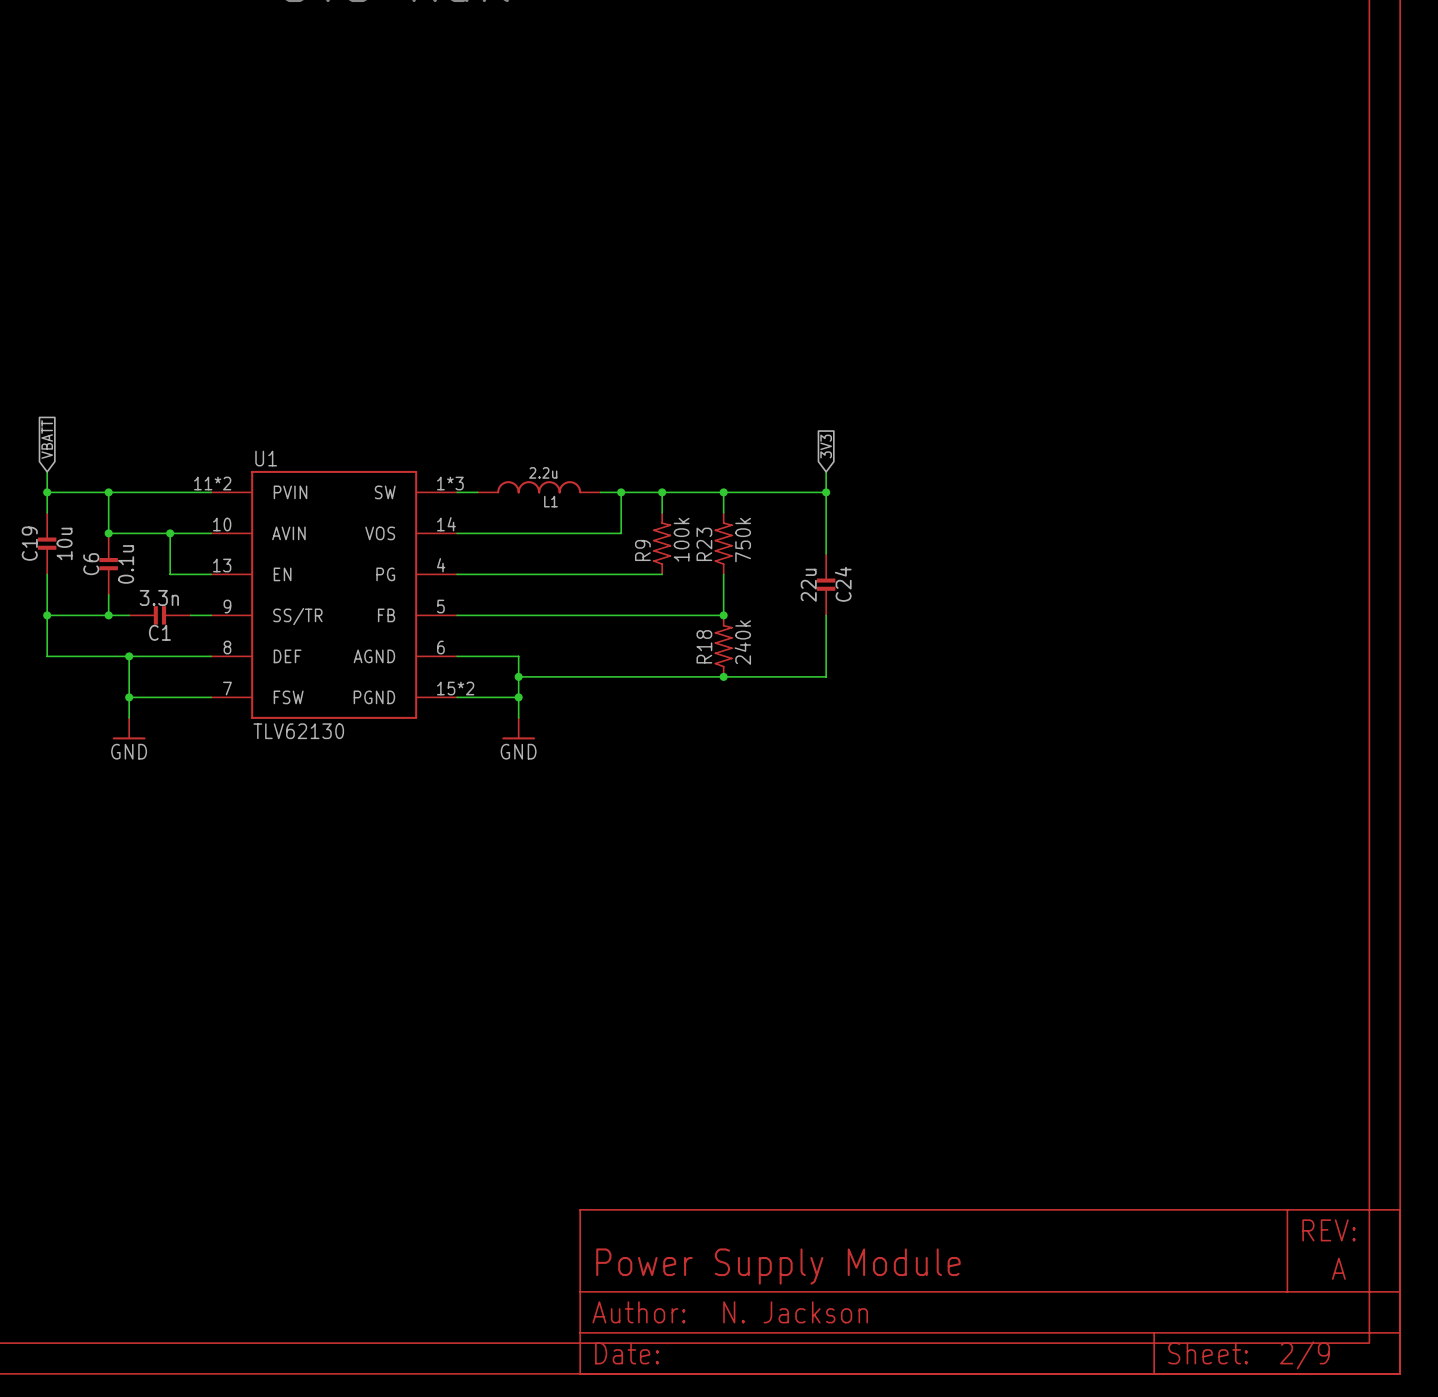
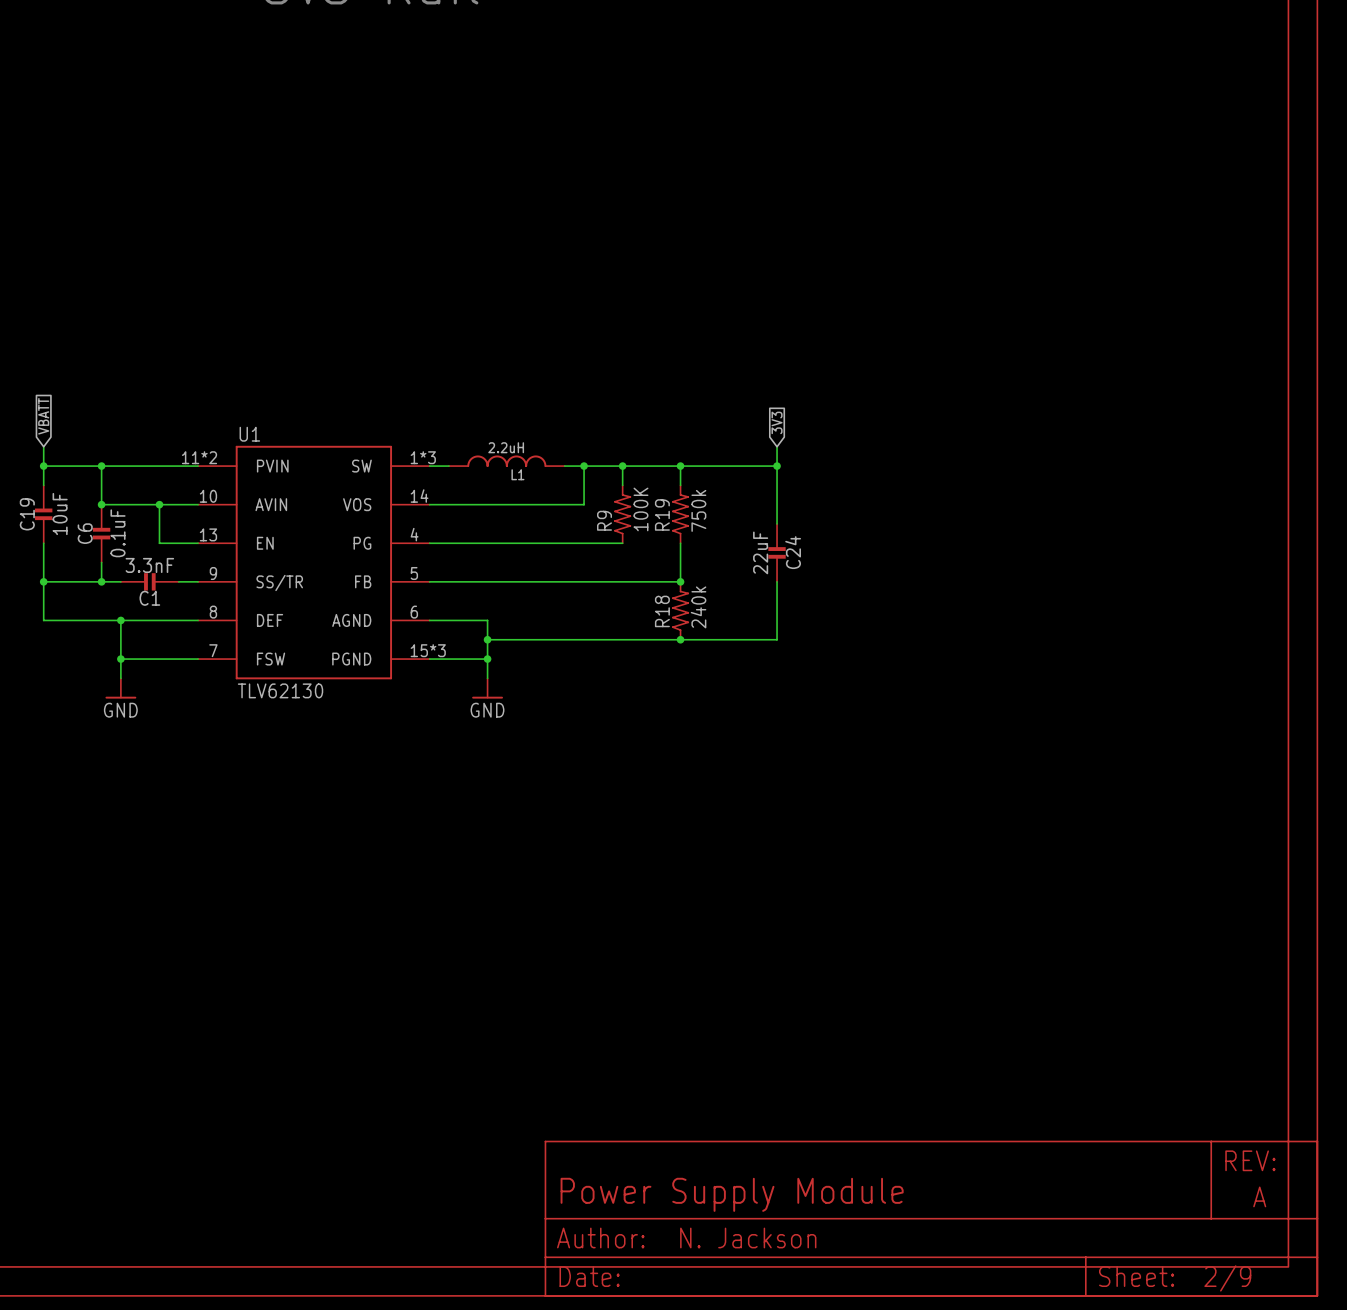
L1 value: 2.2u (543, 472) -> 2.2uH (506, 447)
R9 value: 100k (681, 539) -> 100K (640, 509)
C19 value: 10u (64, 543) -> 10uF (60, 514)
R23 name: R23 (704, 544) -> R19 (662, 514)
C6 value: 0.1u (126, 564) -> 0.1uF (118, 533)
C24 value: 22u (808, 585) -> 22uF (760, 552)
C1 value: 3.3n (159, 597) -> 3.3nF (149, 565)
U1 pin number: 15*2 (455, 688) -> 15*3 (428, 650)

